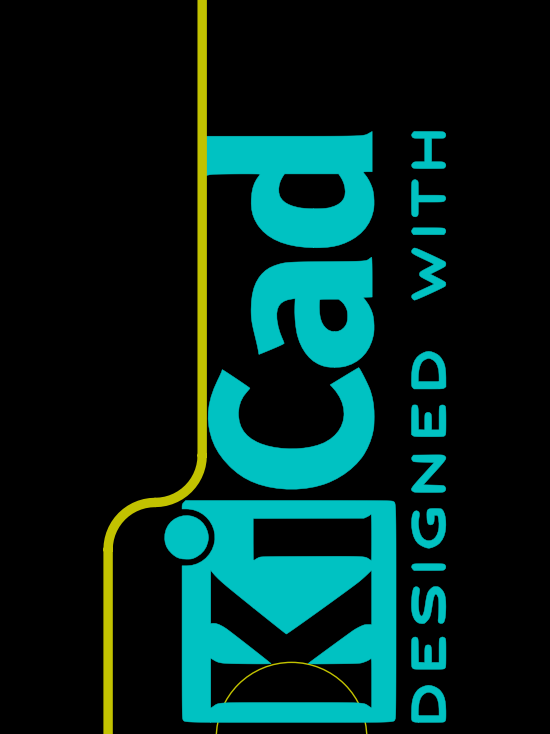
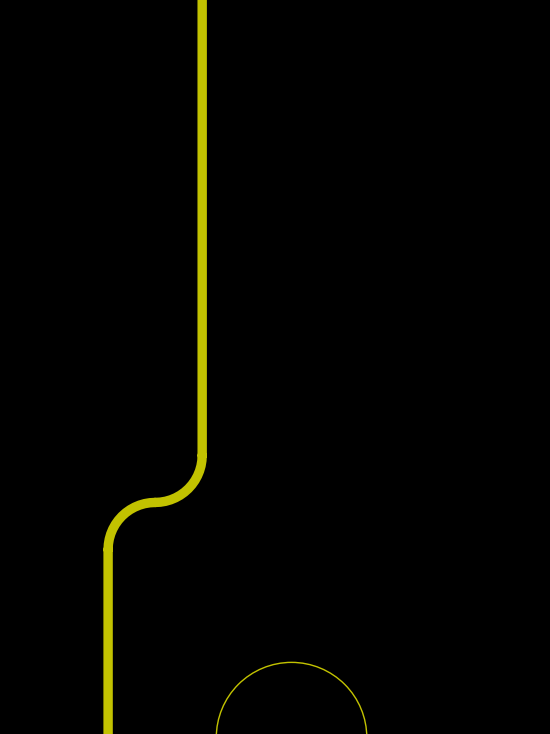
drawing: [164, 131, 447, 723] -> none

